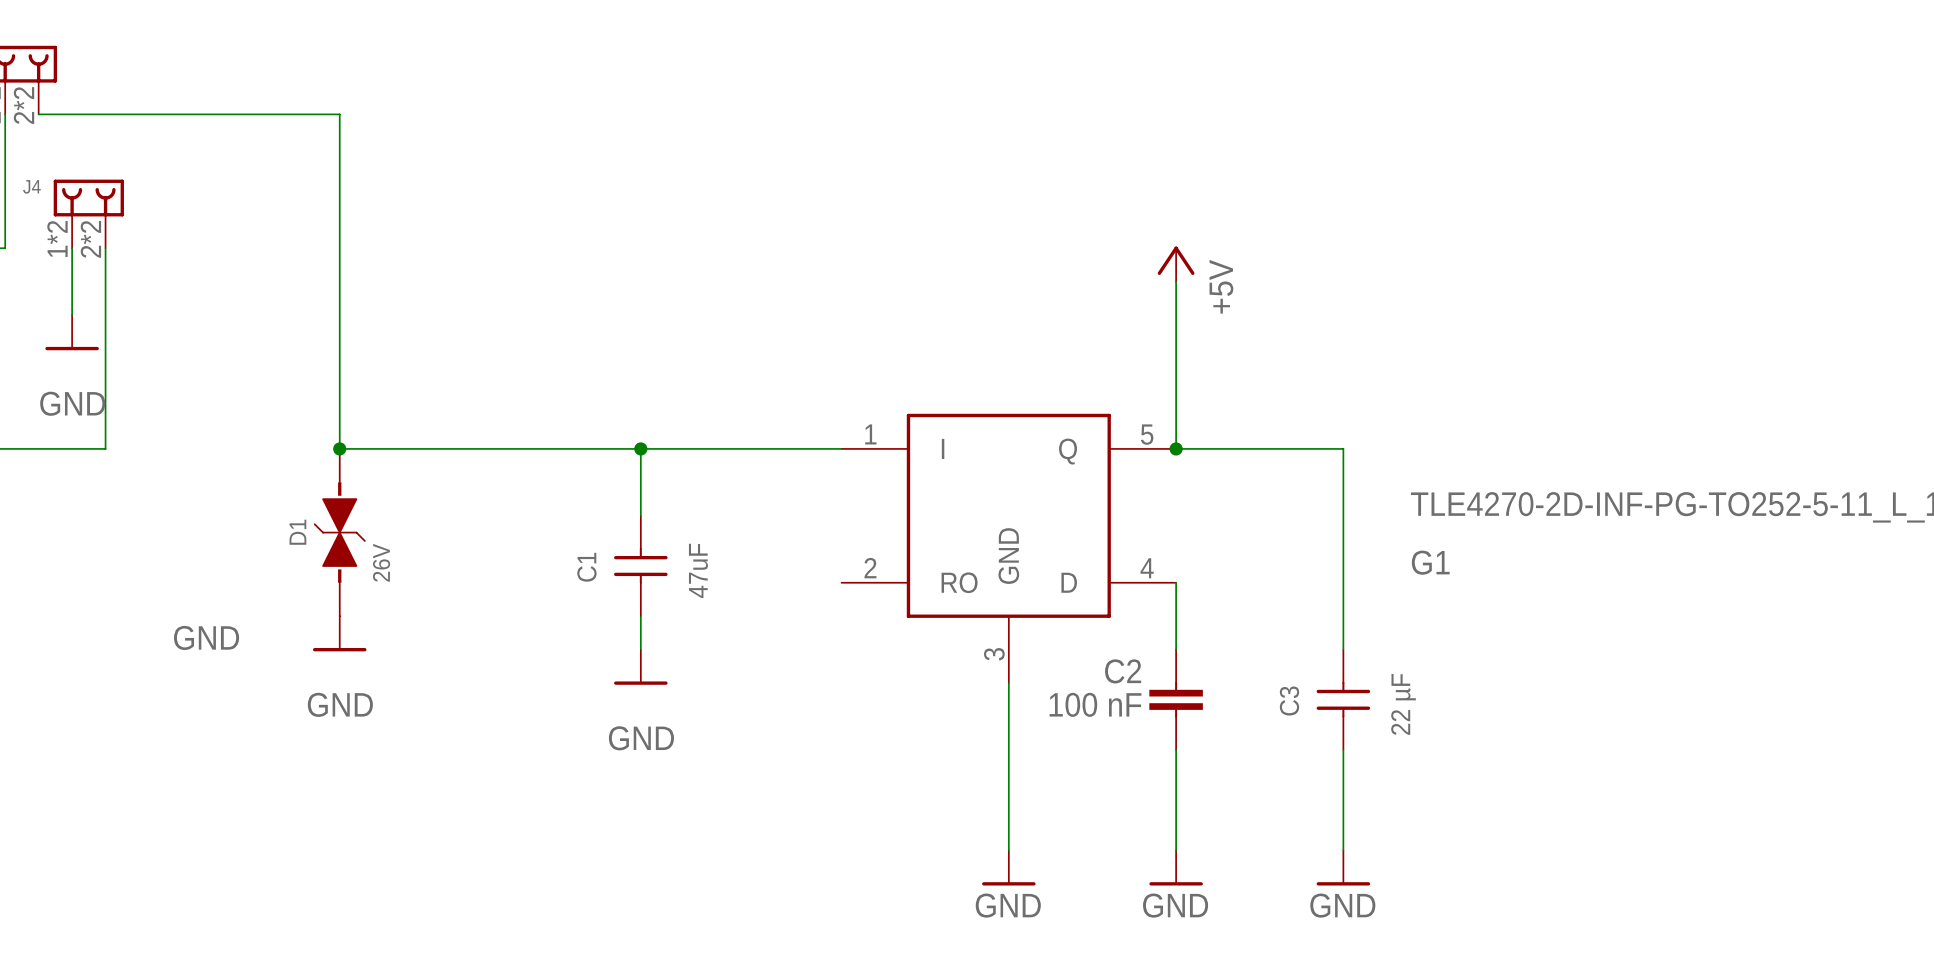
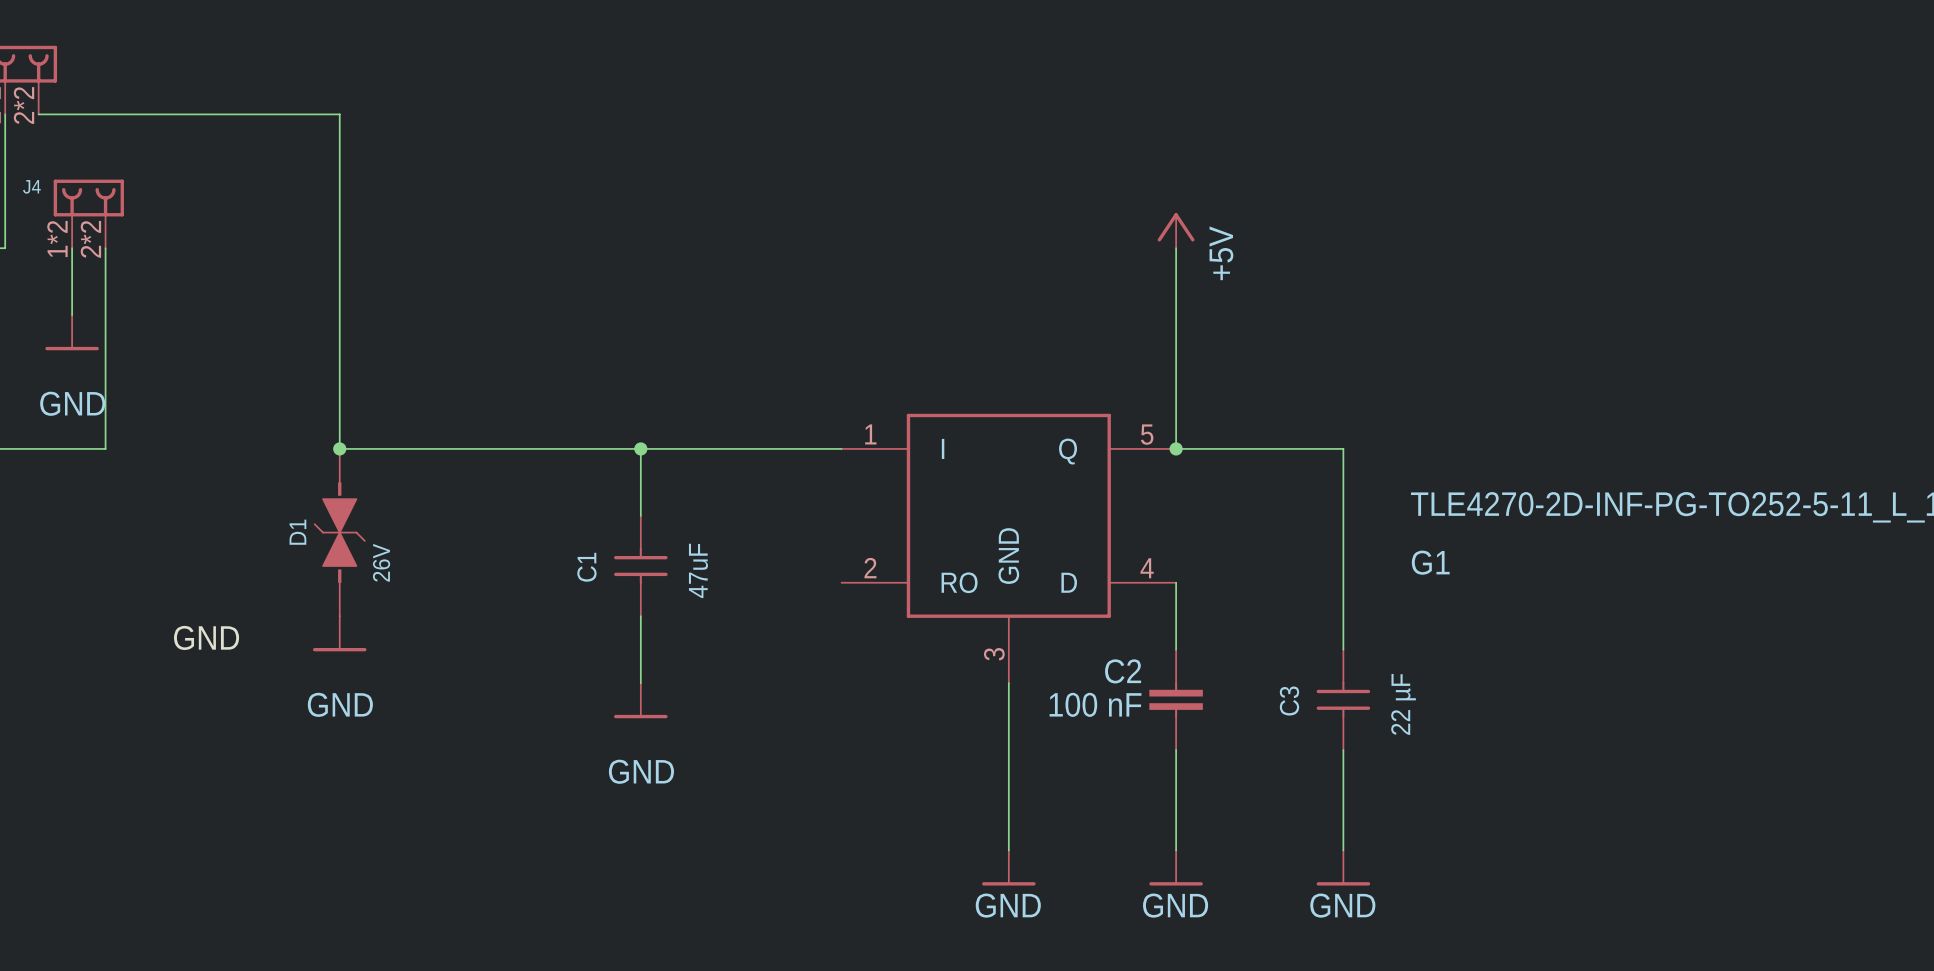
power symbol position: +5V (1176, 264) -> +5V (1176, 230)
power symbol position: GND (640, 667) -> GND (640, 700)

